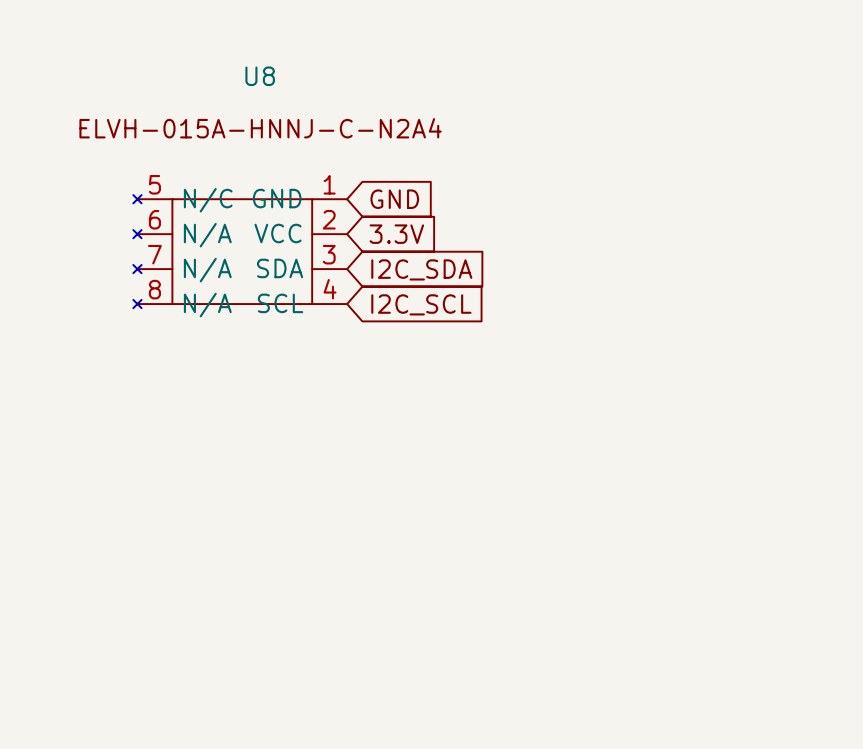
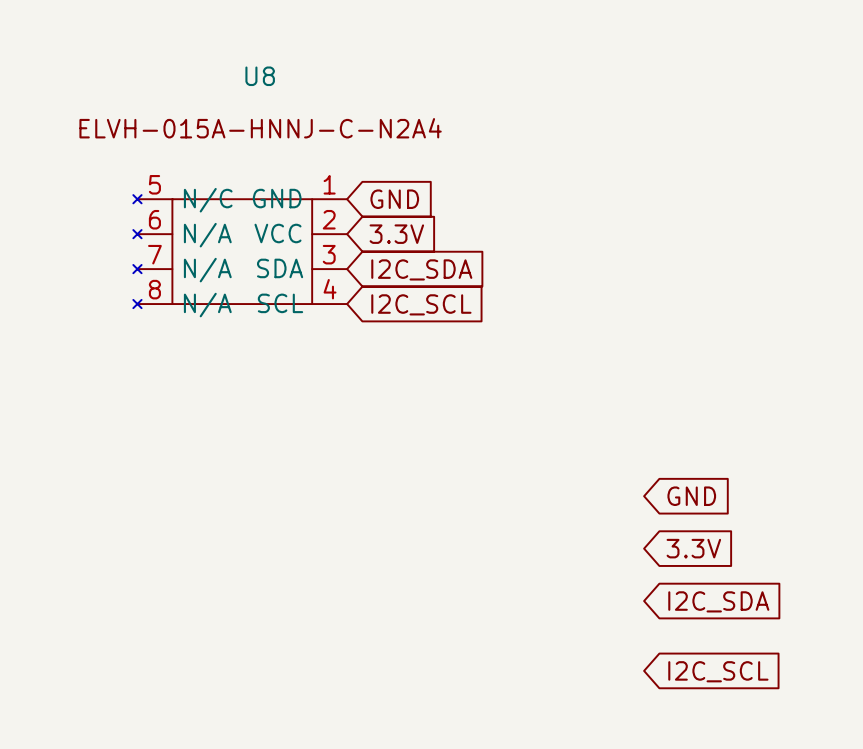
global label: none -> GND (691, 496)
global label: none -> 3.3V (693, 548)
global label: none -> I2C_SDA (718, 601)
global label: none -> I2C_SCL (718, 671)

